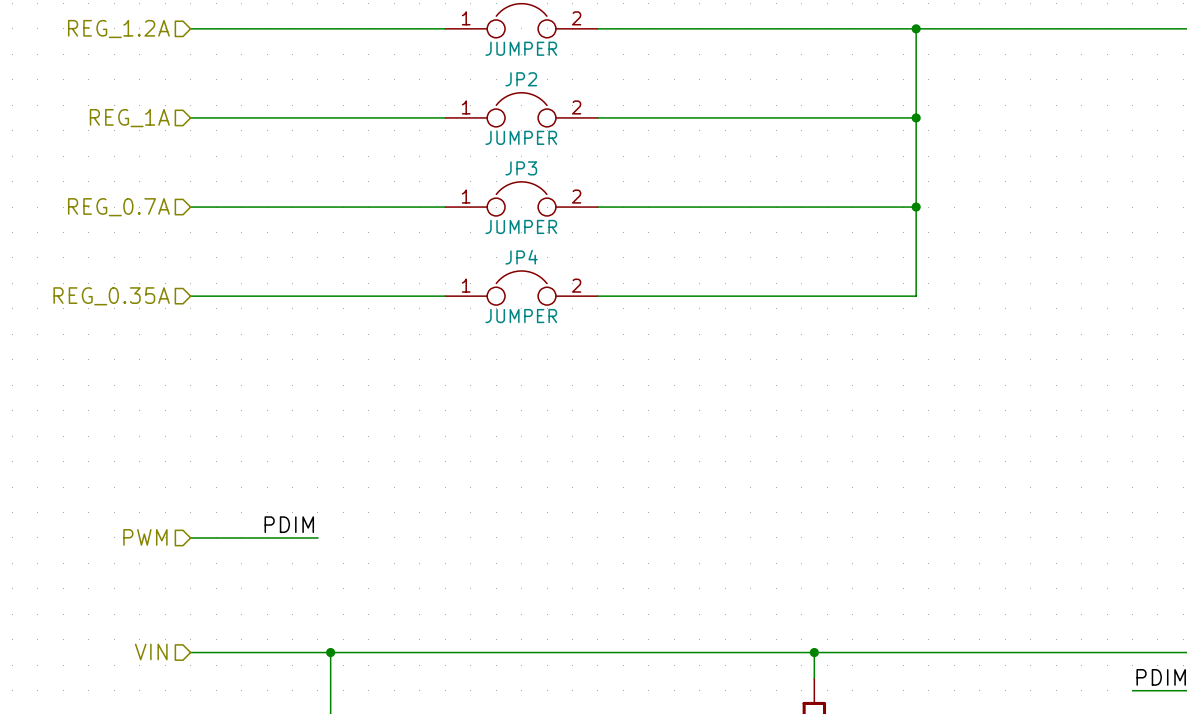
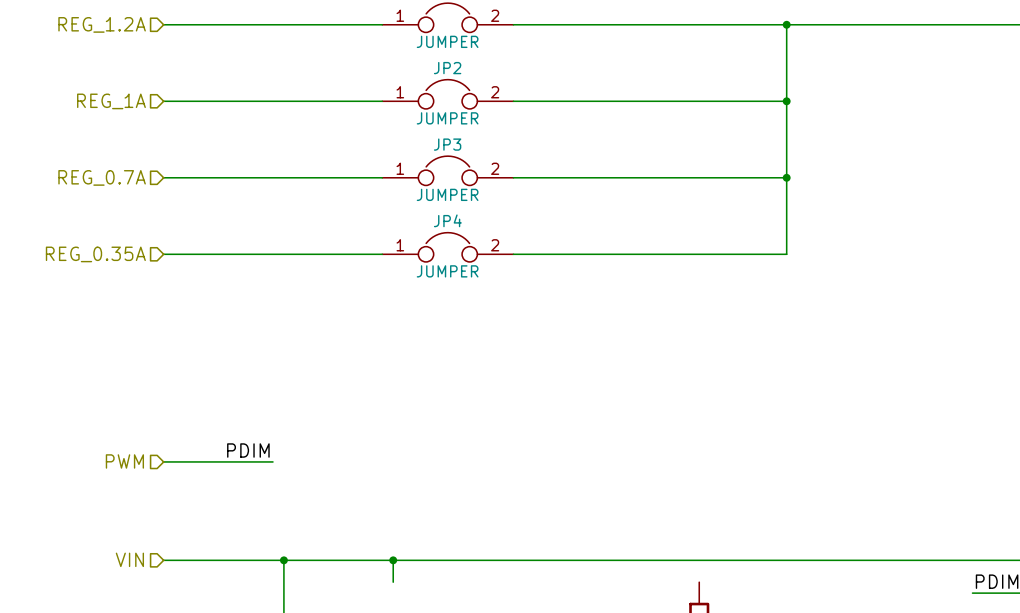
wire: none -> (393, 560) (393, 582)
junction: none -> (393, 560)
wire: (814, 652) (814, 678) -> none
junction: (814, 652) -> none

